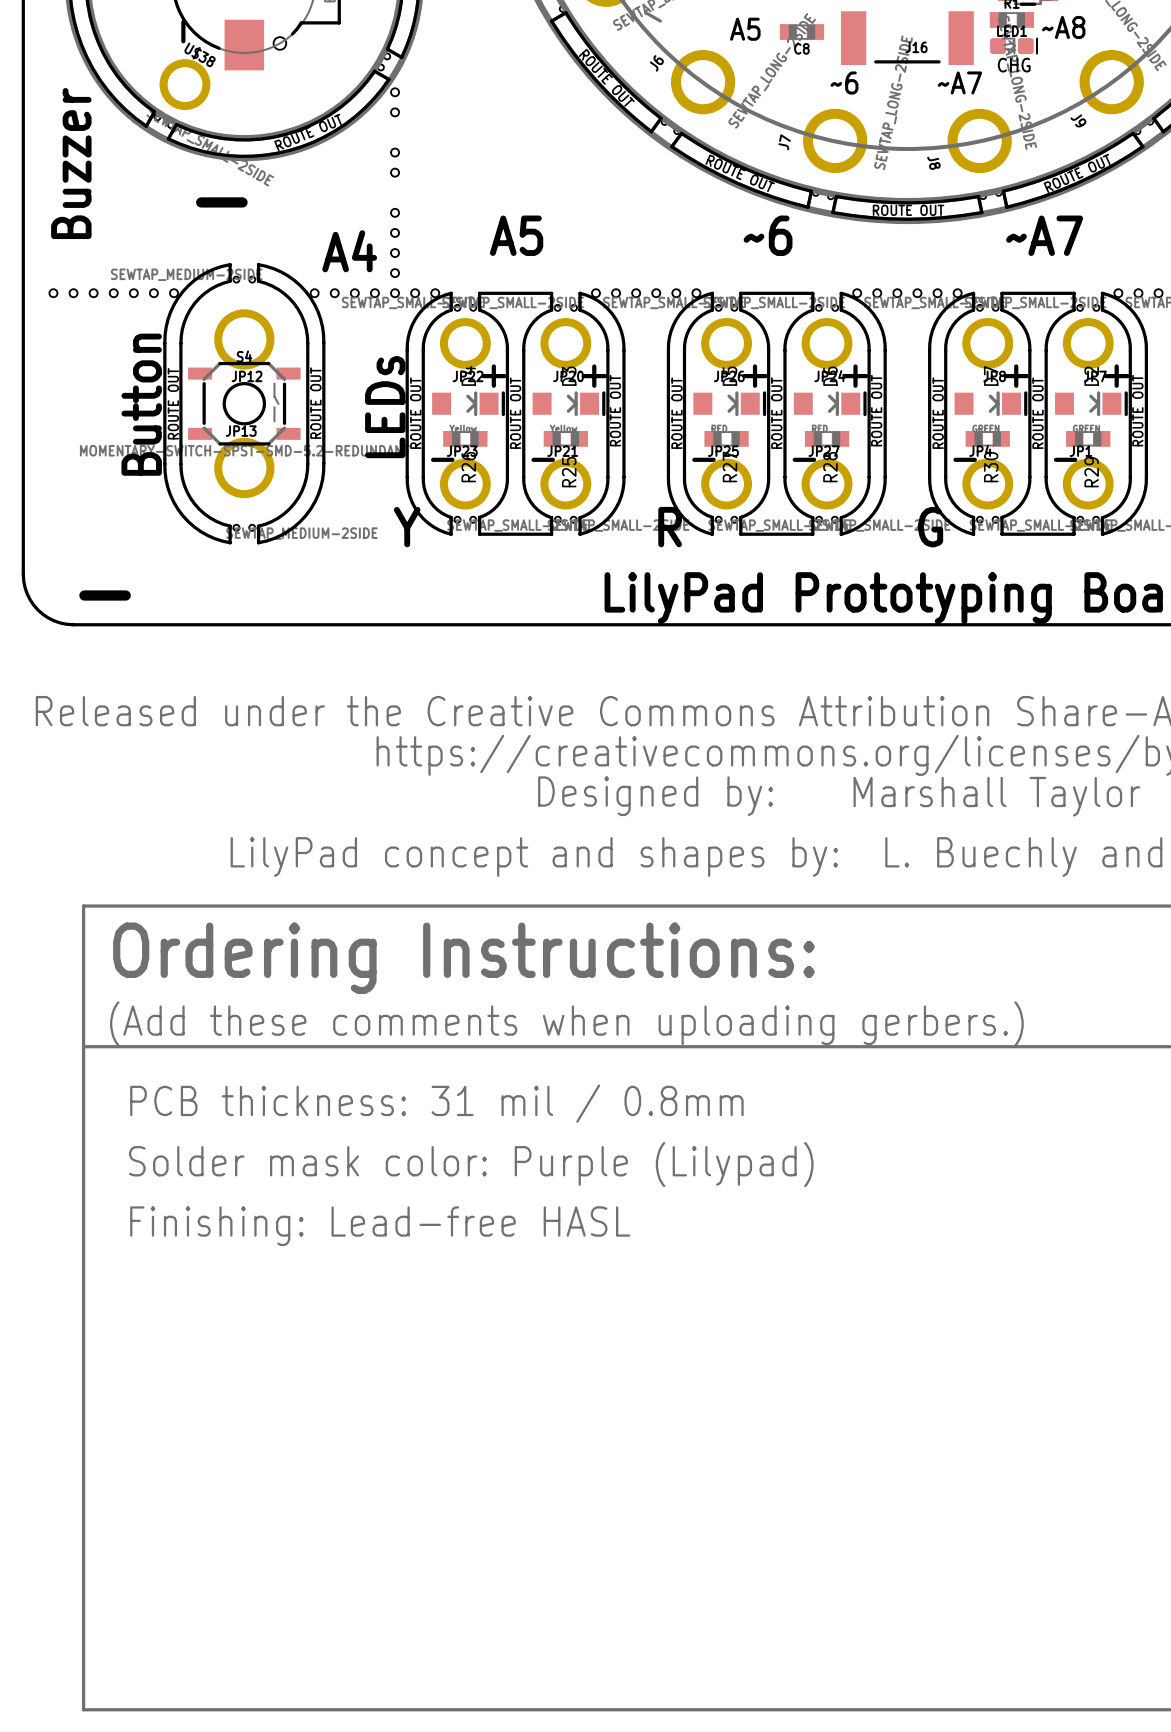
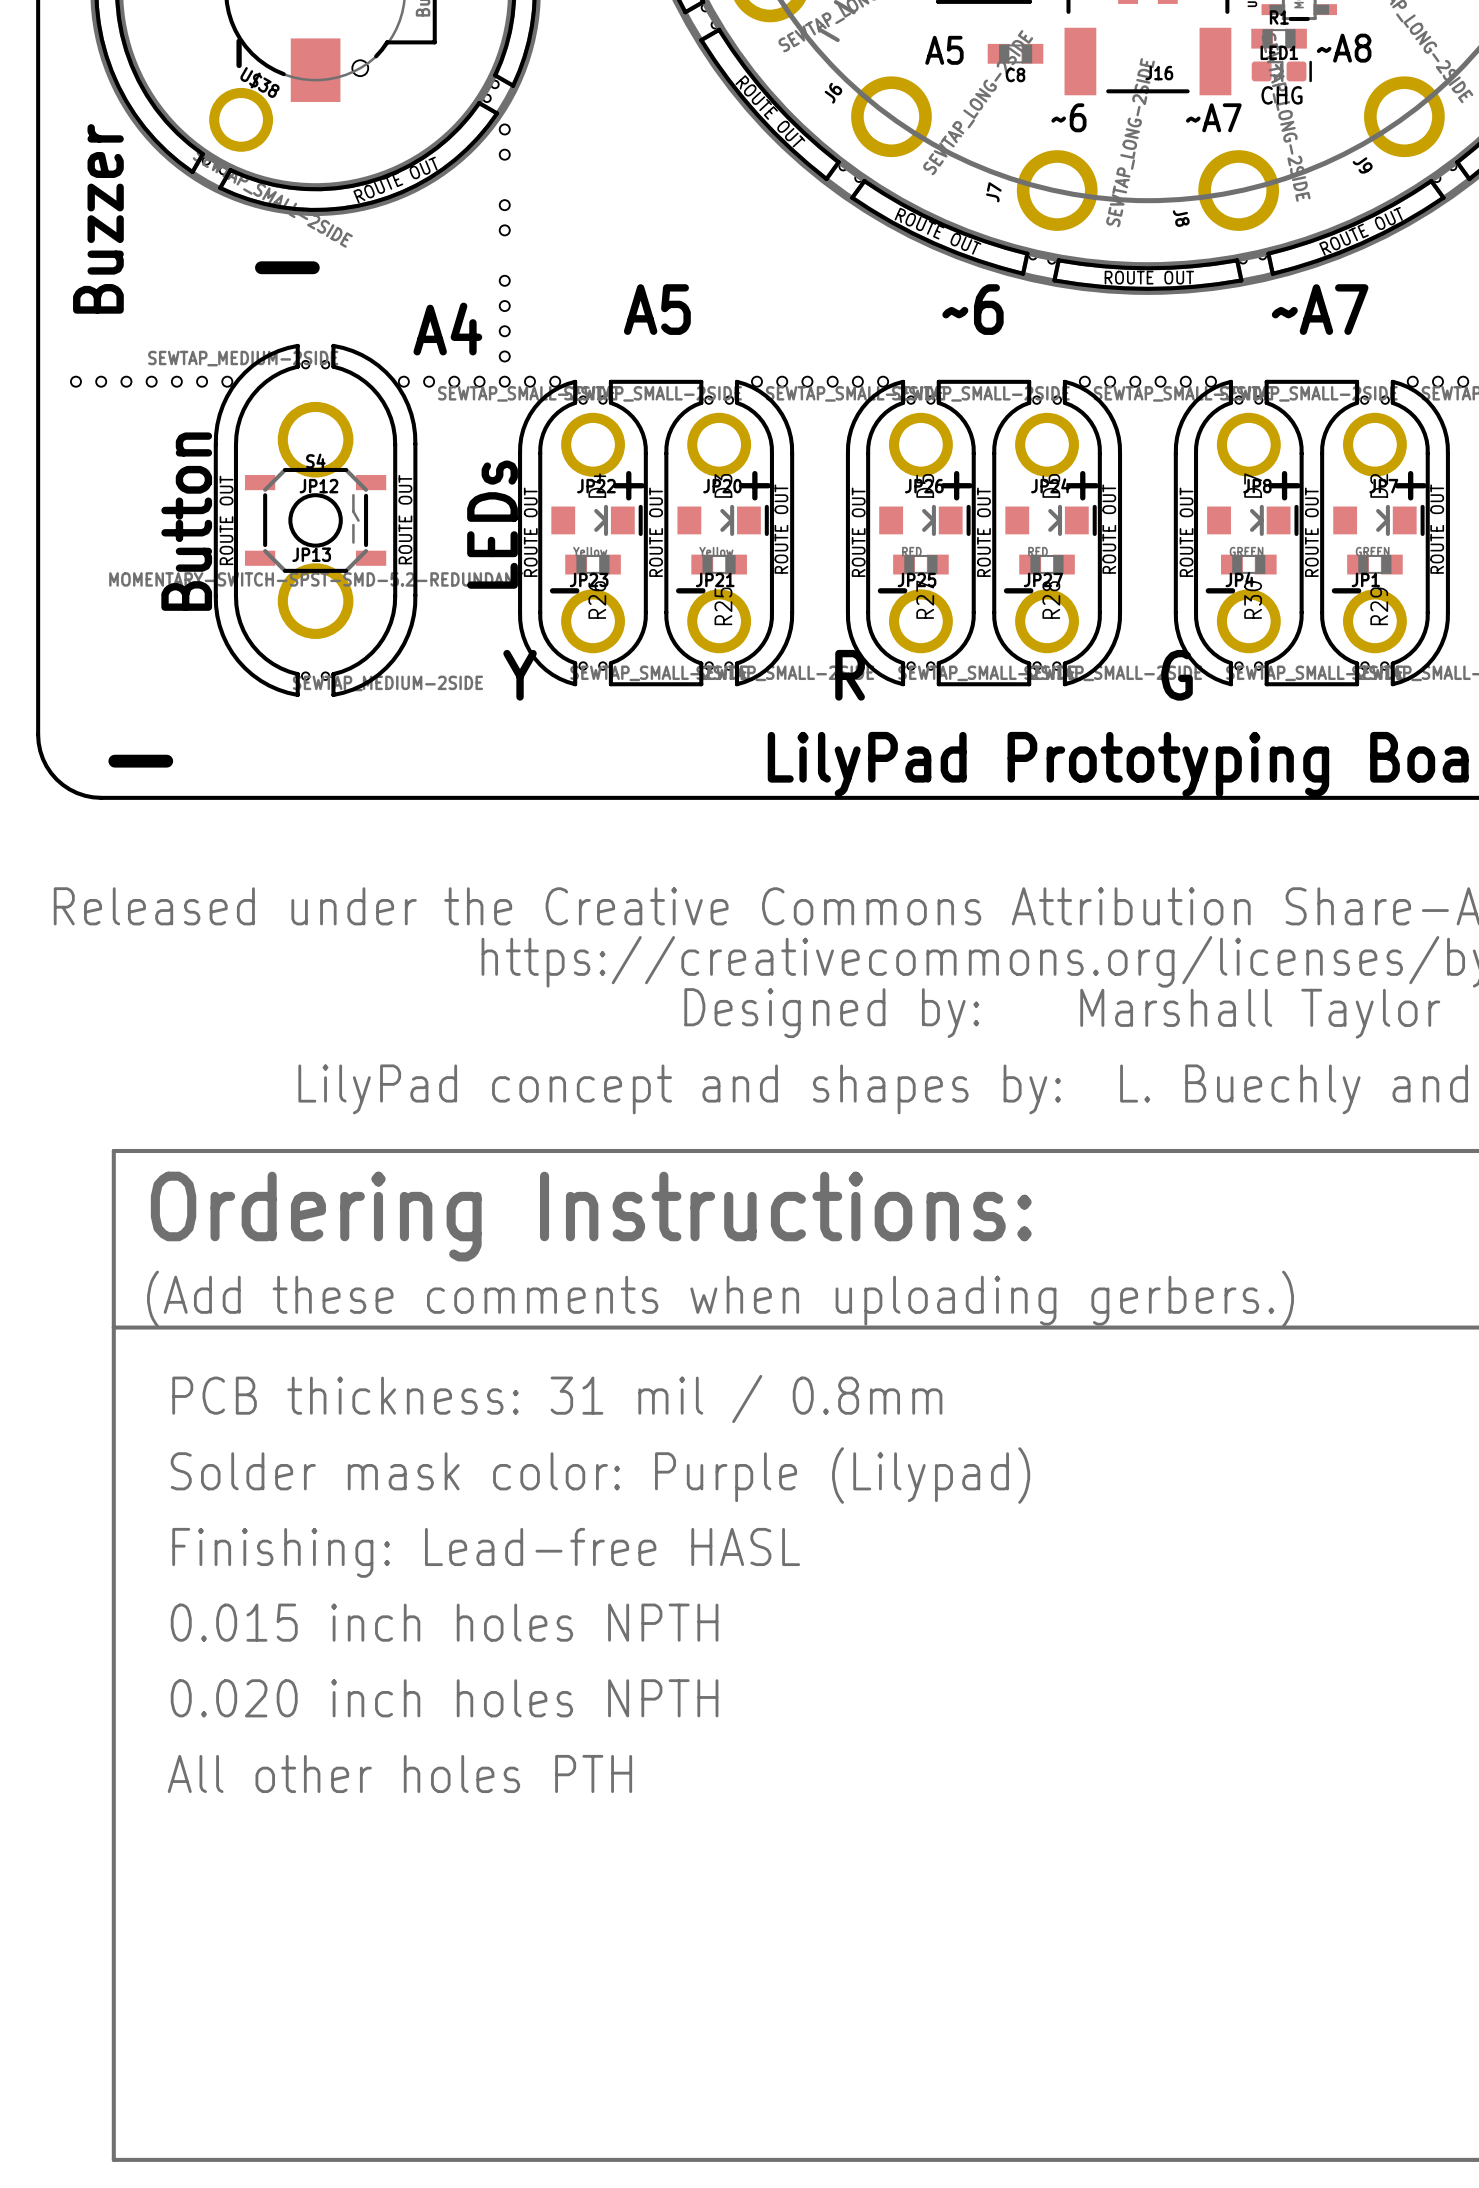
text: none -> 0.015 inch holes NPTH (444, 1622)
text: none -> 0.020 inch holes NPTH (444, 1698)
text: none -> All other holes PTH (399, 1773)

